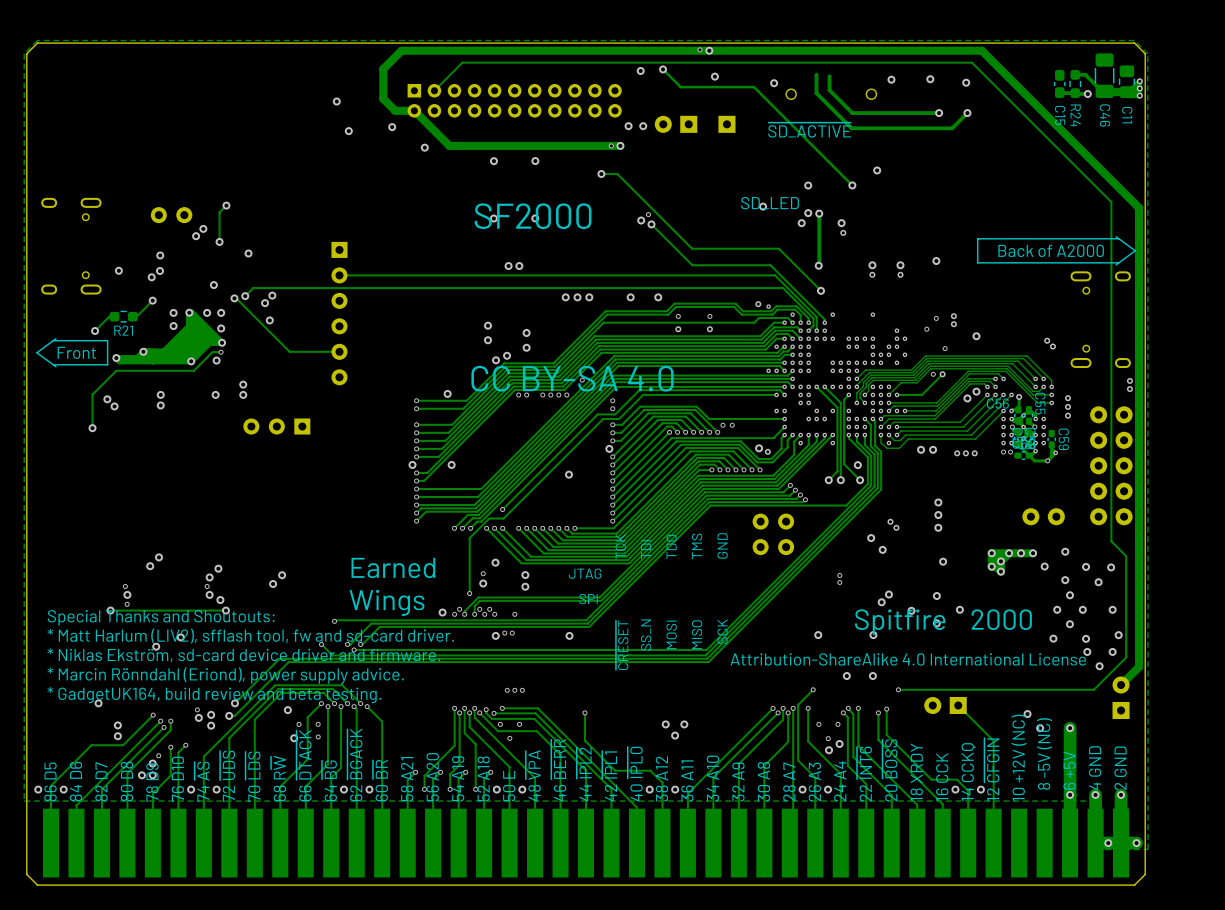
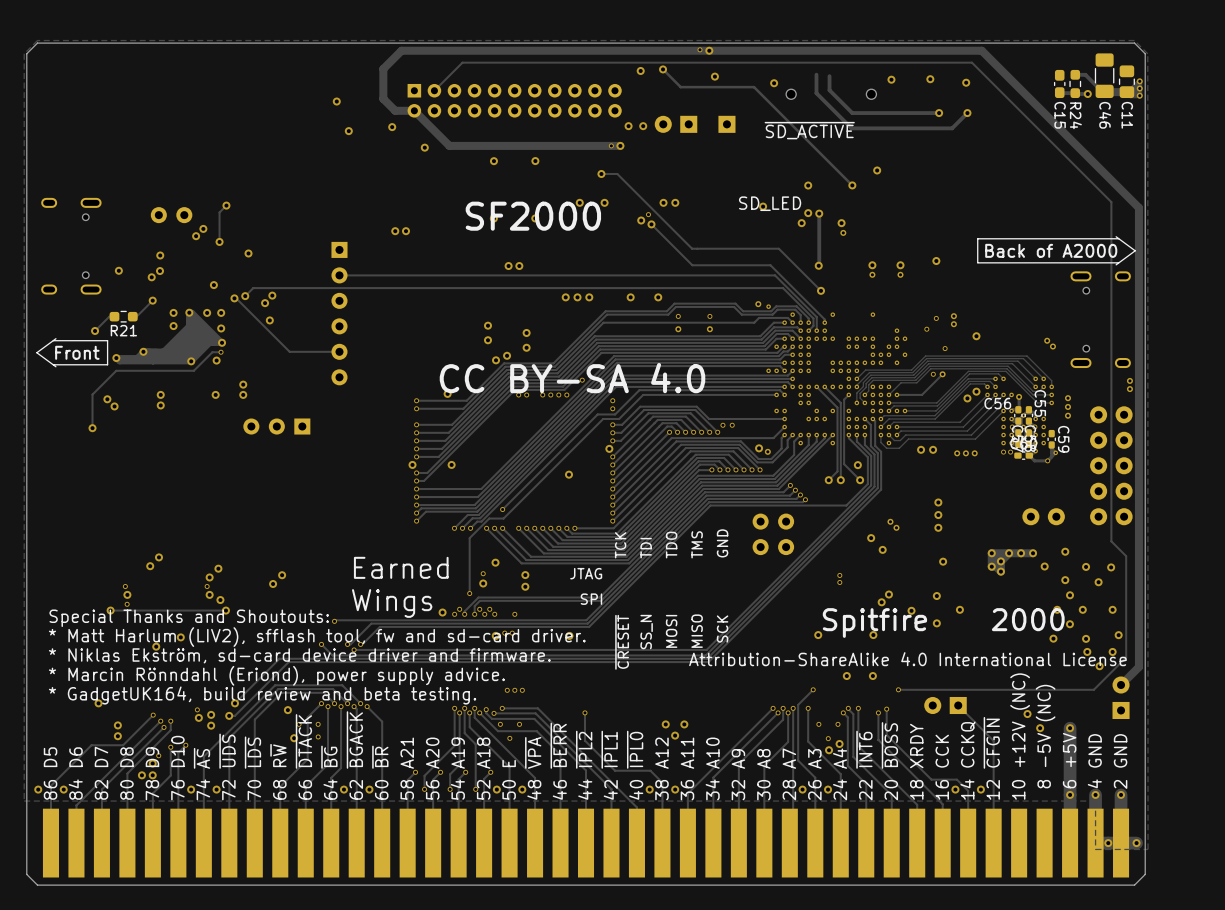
via: none -> (579, 202)
via: none -> (604, 202)
via: none -> (663, 202)
via: none -> (675, 202)
via: none -> (395, 231)
via: none -> (405, 231)

